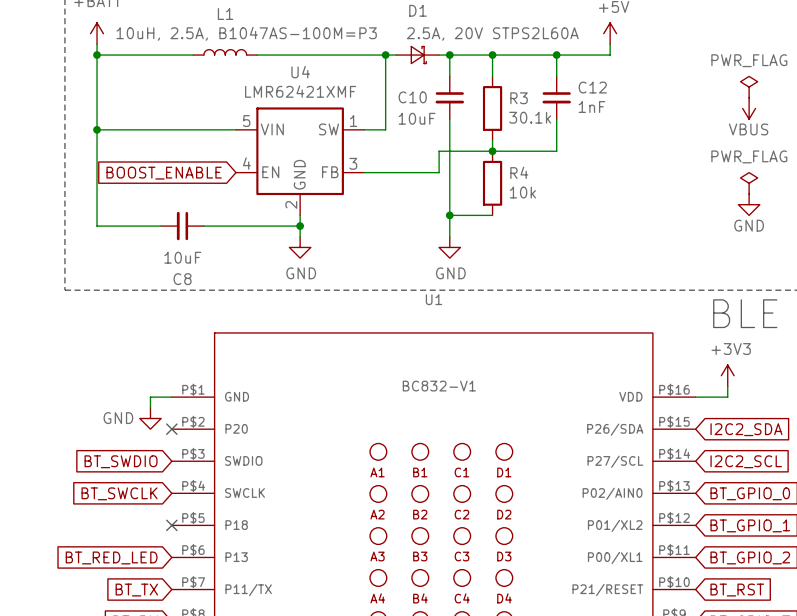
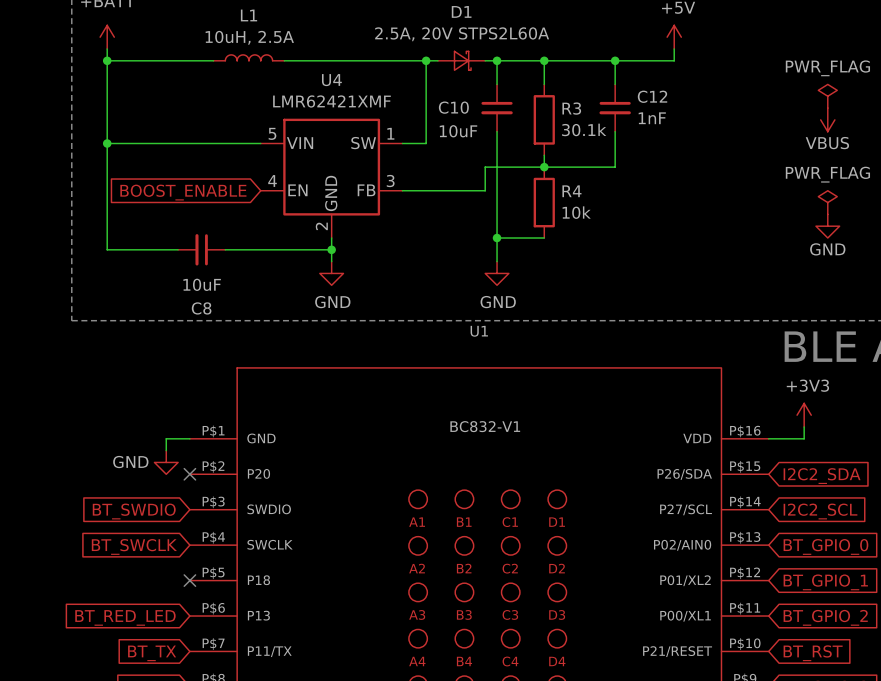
L1 value: 10uH, 2.5A, B1047AS-100M=P3 (246, 33) -> 10uH, 2.5A (249, 37)
D1 value position: 2.5A, 20V STPS2L60A (492, 34) -> 2.5A, 20V STPS2L60A (462, 34)

